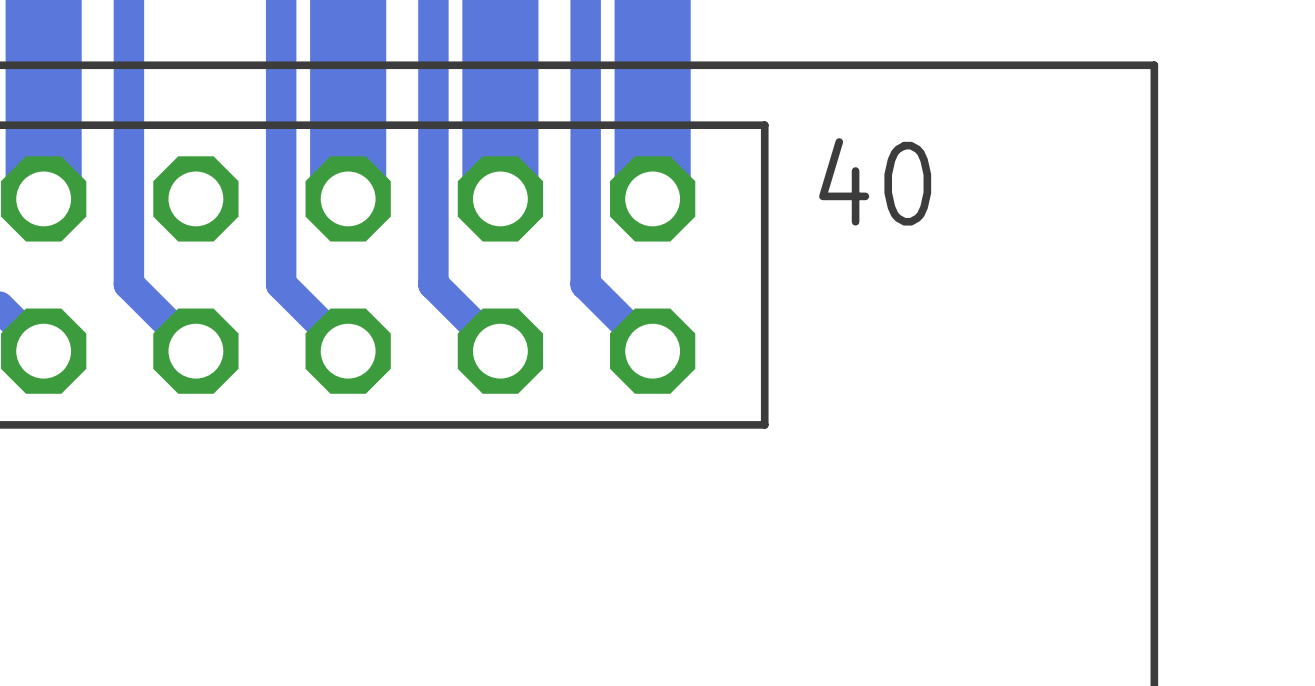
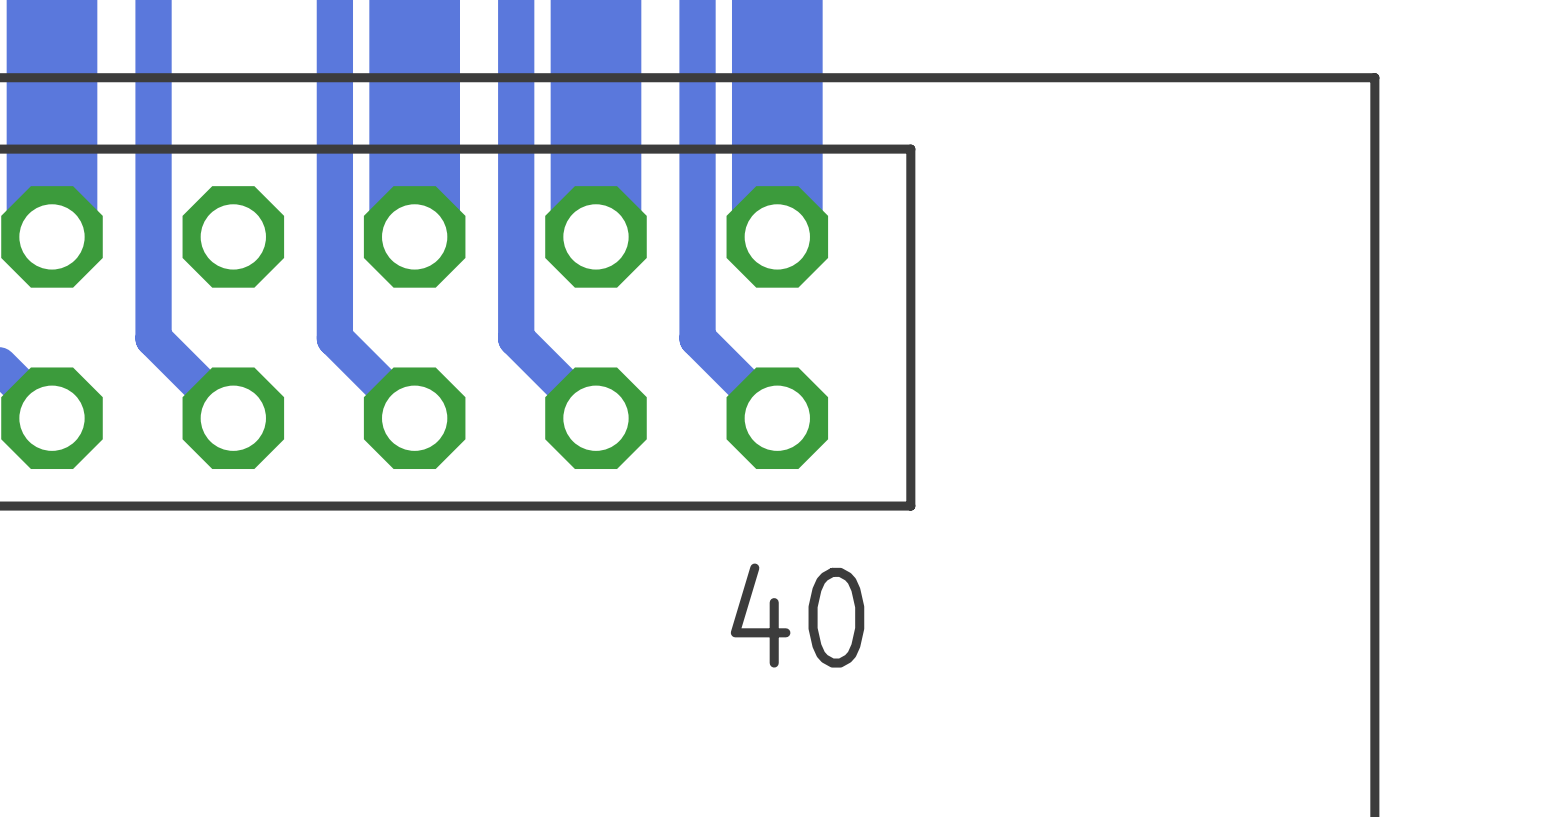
part text position: 40 (875, 181) -> 40 (797, 615)

